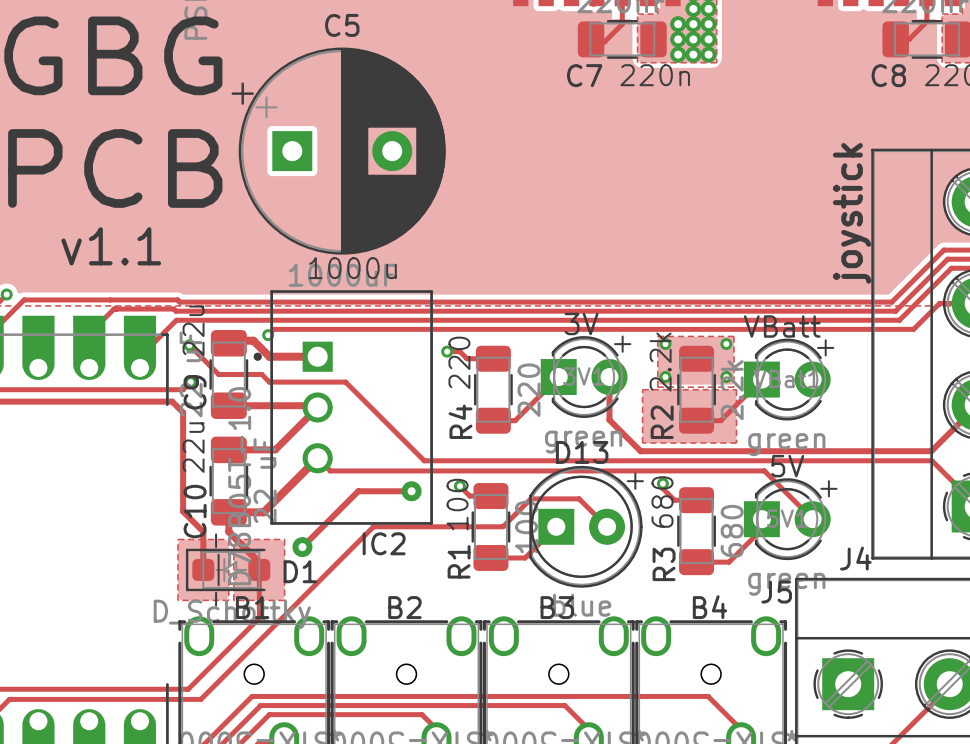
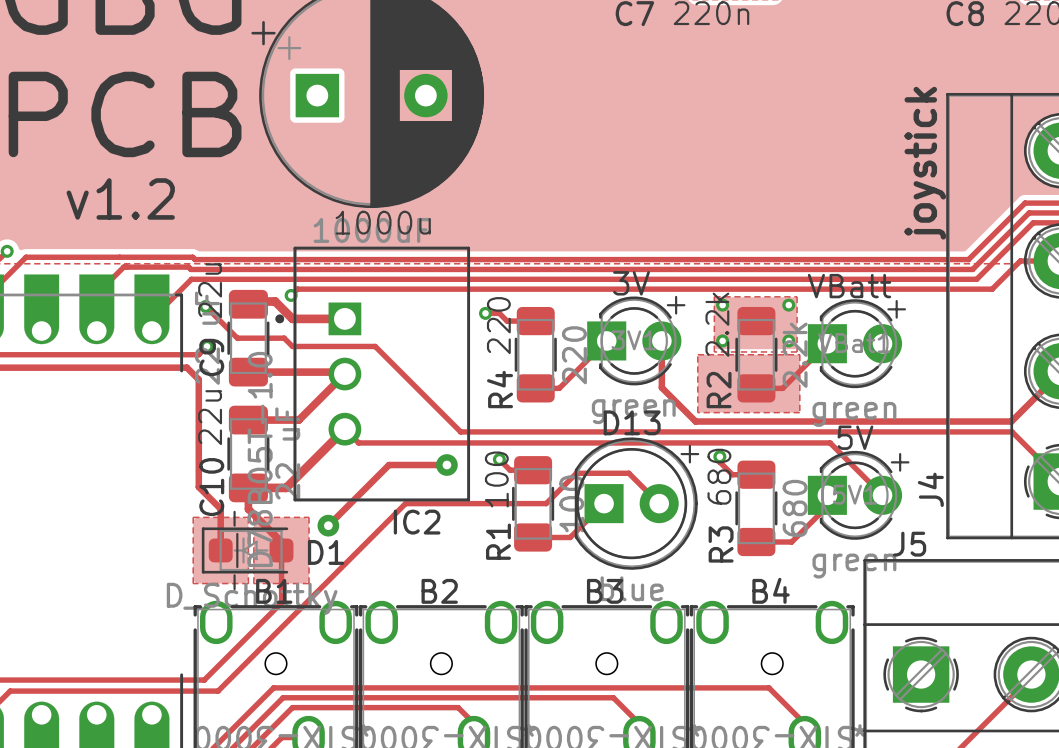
text: v1.1 (111, 246) -> v1.2 (120, 198)
J4 name rotation: 0° (855, 558) -> 90° counterclockwise (930, 489)
J4 name position: J4 (855, 558) -> J4 (930, 489)
J5 name position: J5 (776, 592) -> J5 (909, 544)

